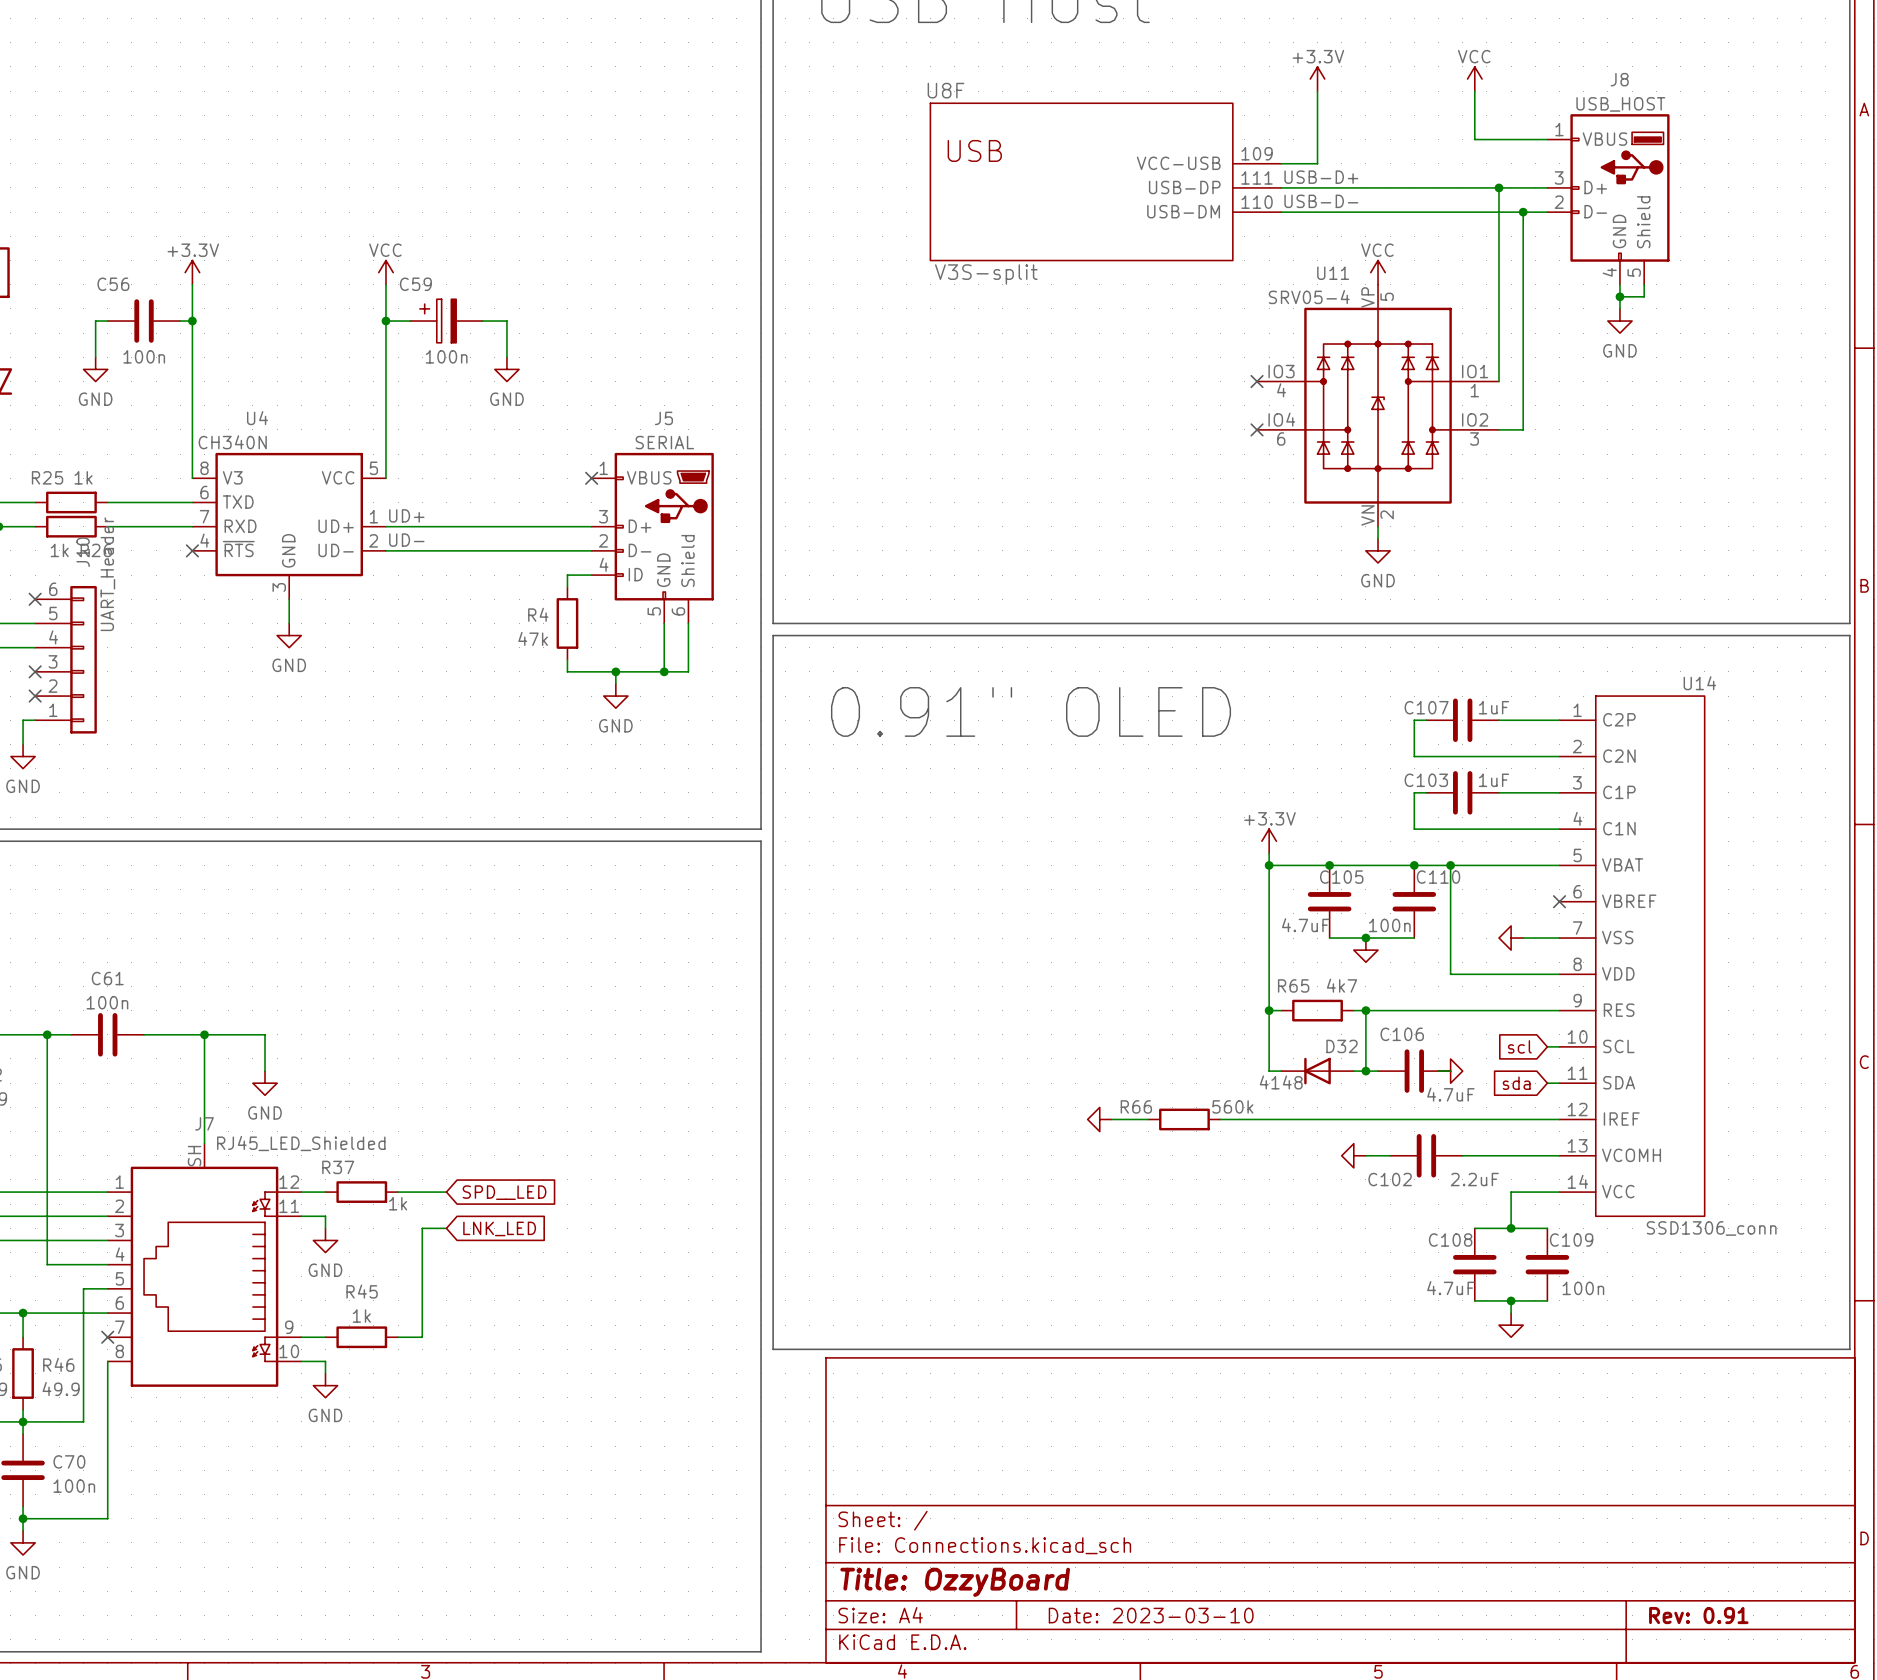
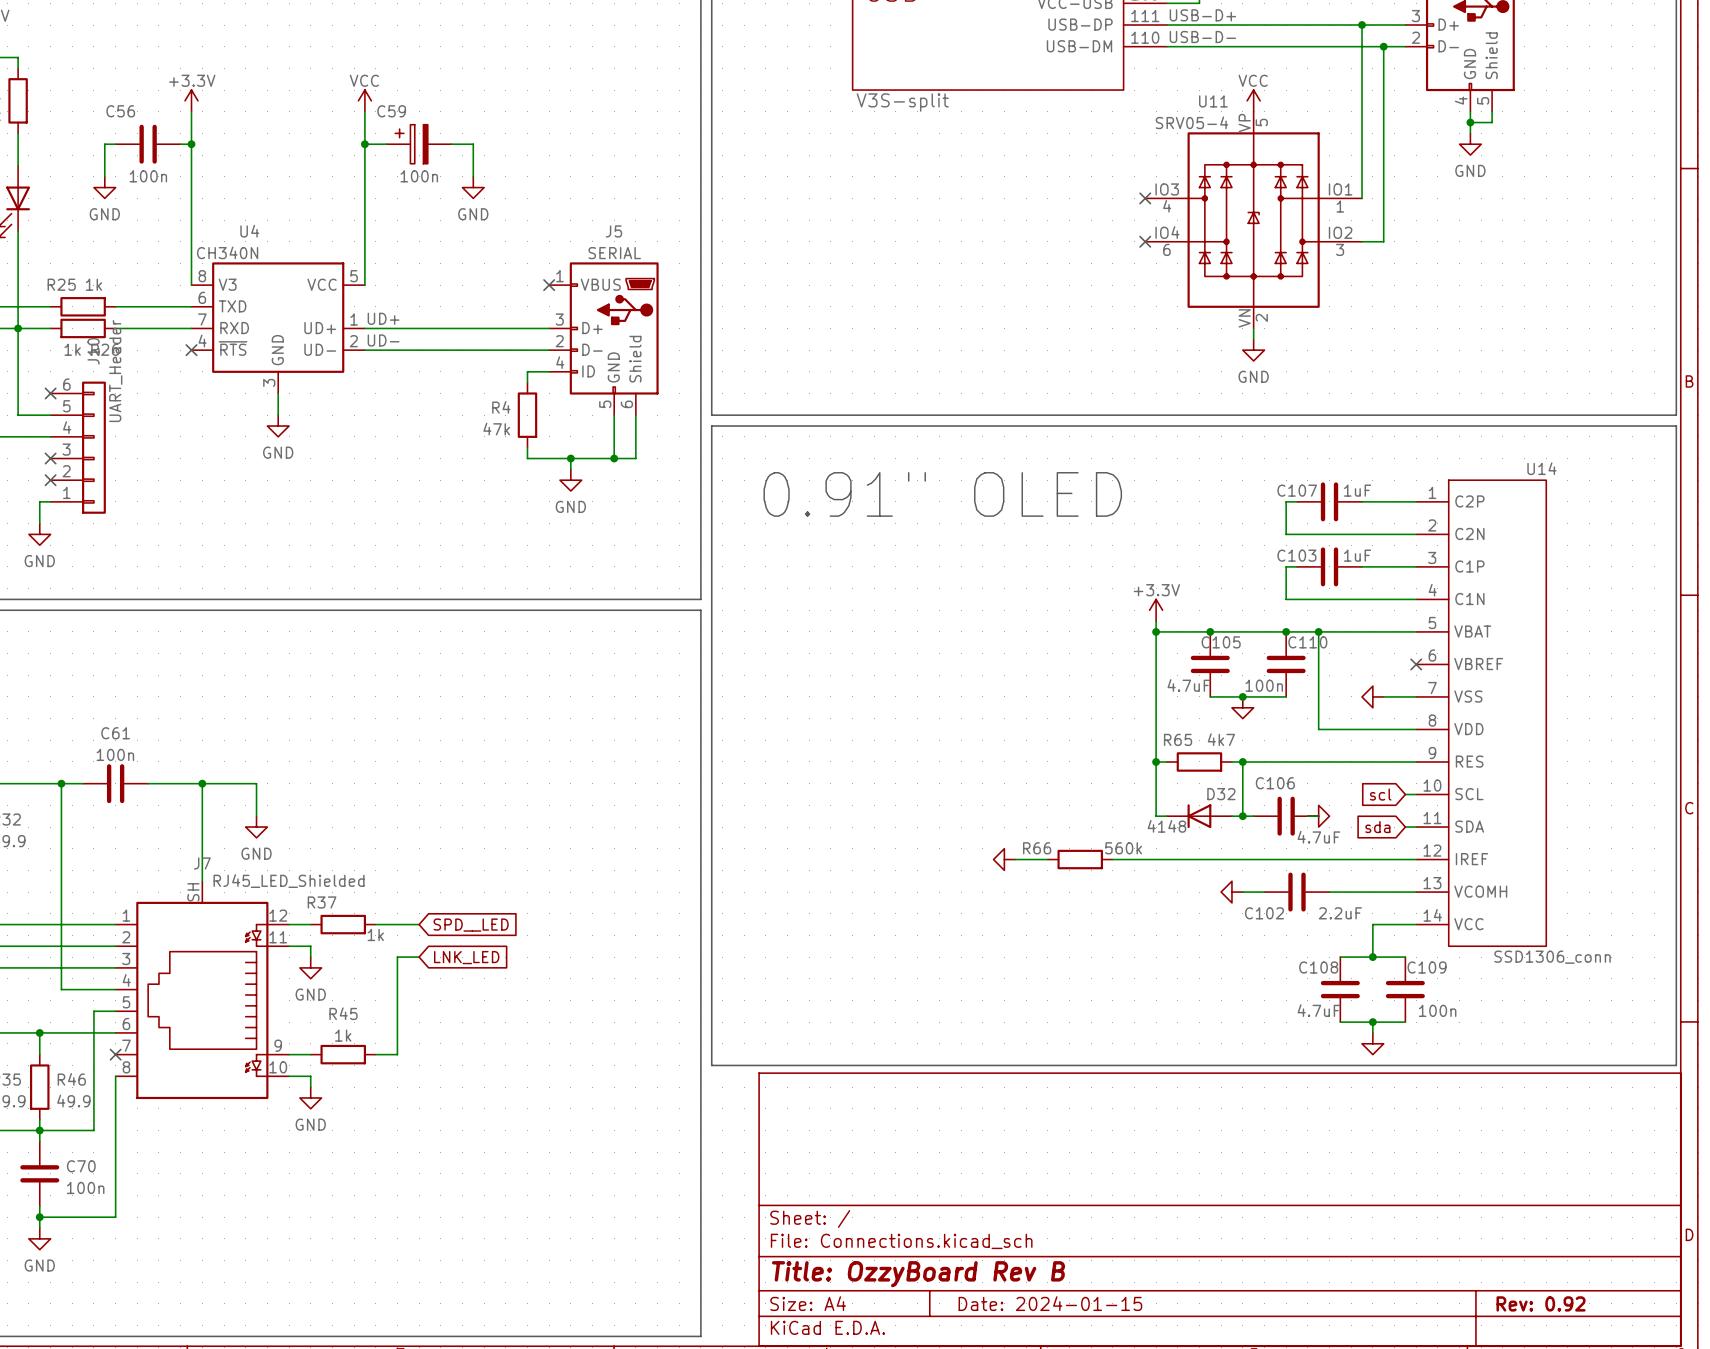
title block: Title: OzzyBoard (955, 1582) -> Title: OzzyBoard Rev B (918, 1274)
title block: Date: 2023-03-10 (1151, 1615) -> Date: 2024-01-15 (1050, 1303)
title block: Rev: 0.91 (1698, 1615) -> Rev: 0.92 (1541, 1303)

